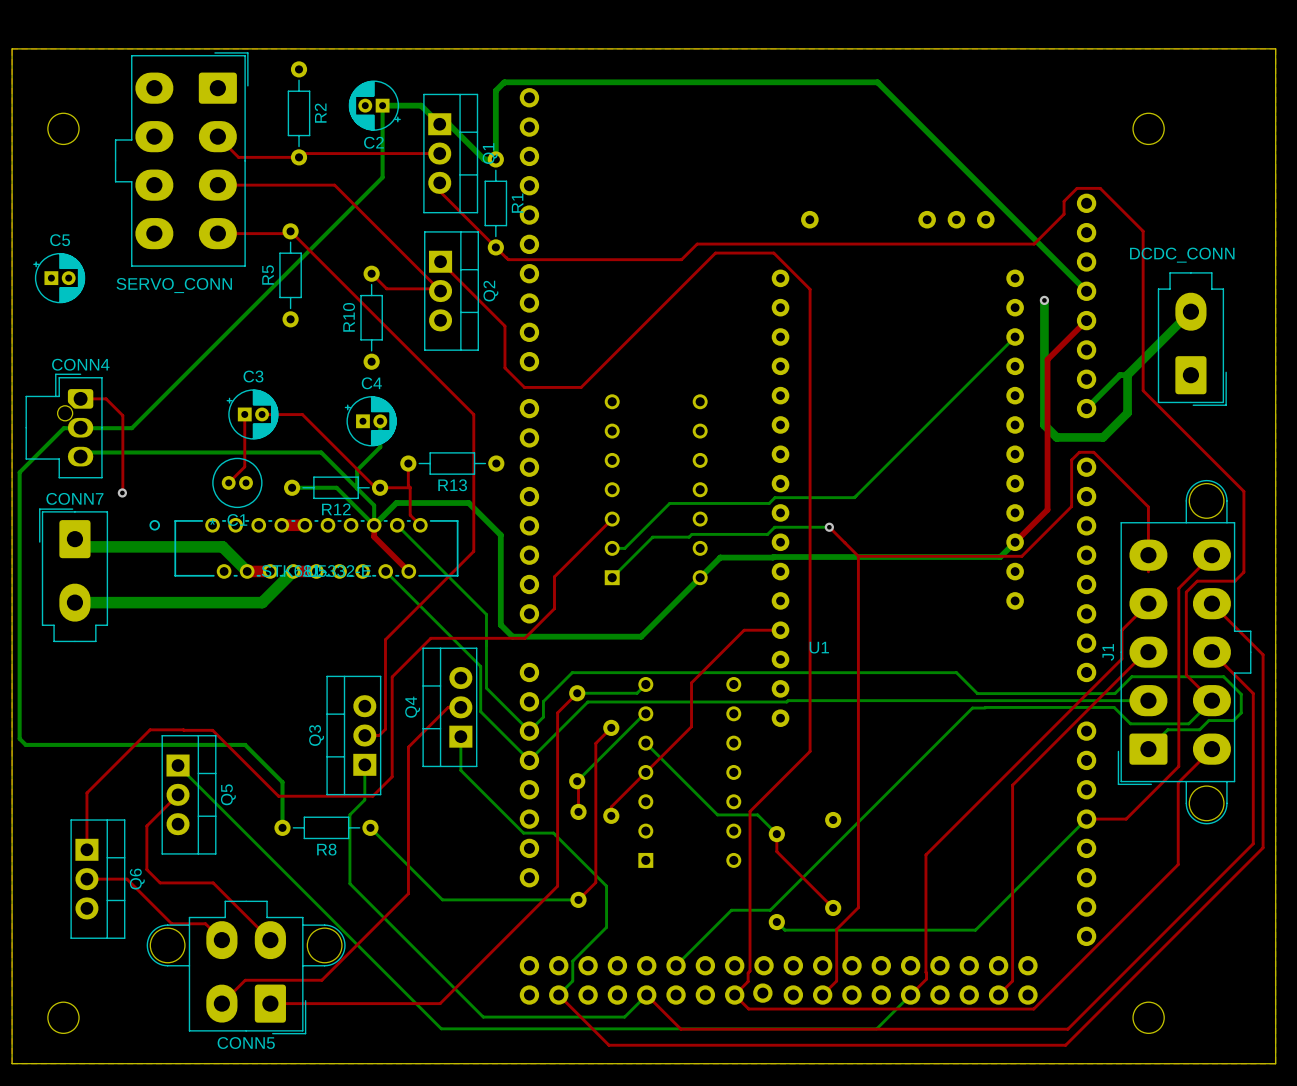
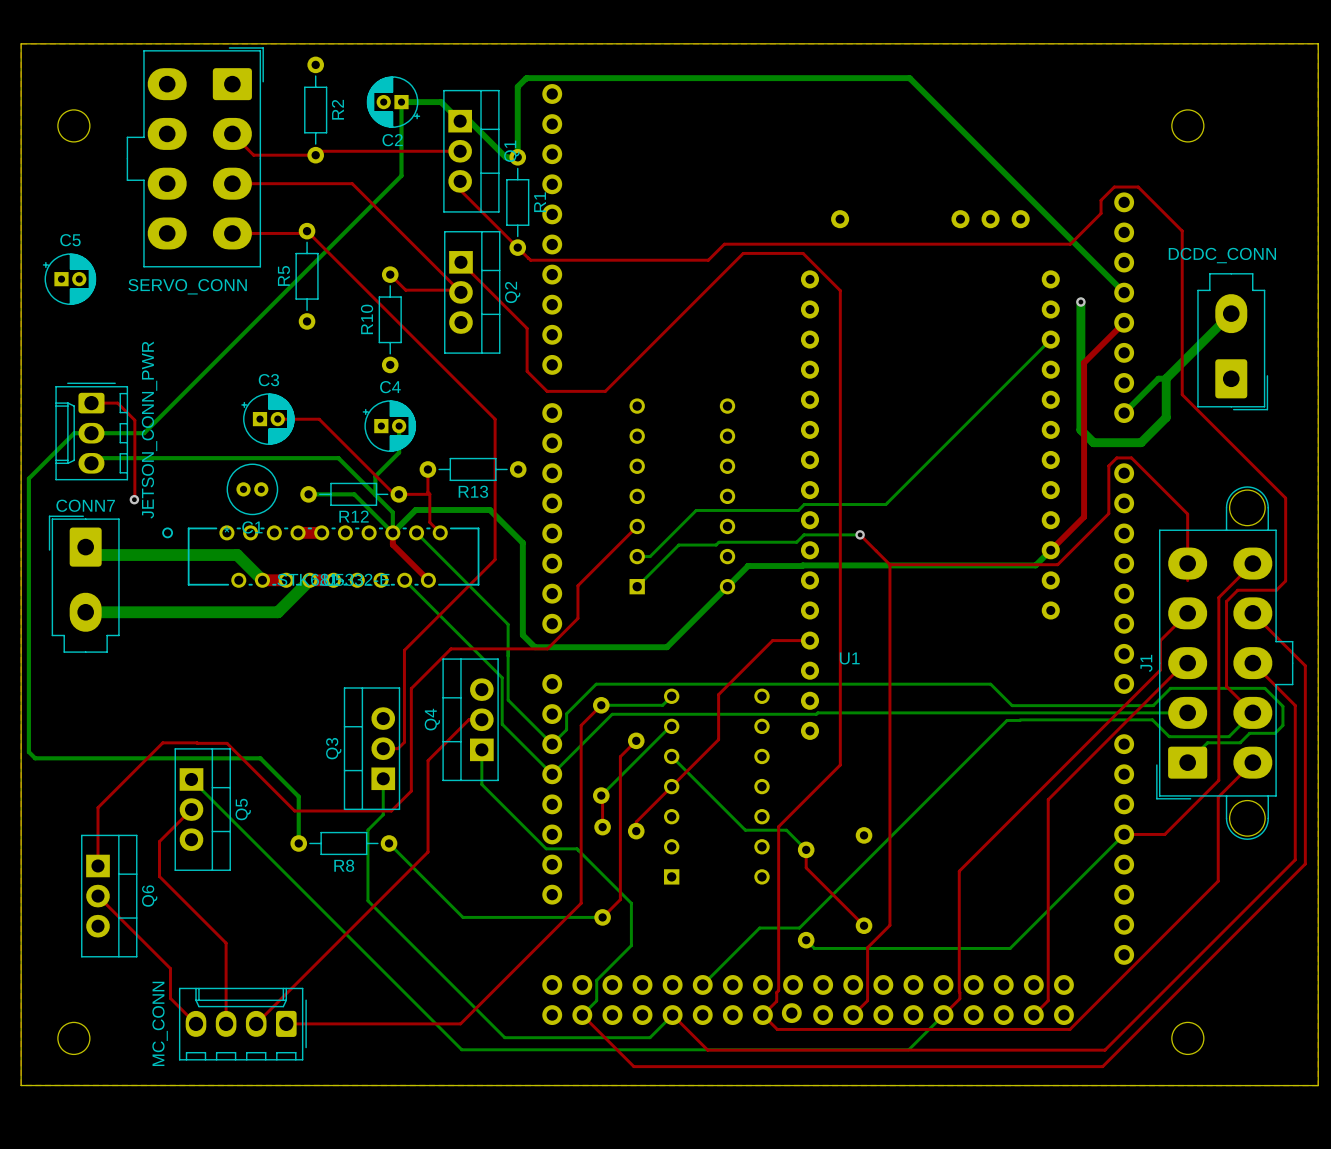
top track: (244, 414) (244, 466) (228, 482) -> none
CONN4: (64, 426) -> none
part: none -> JETSON_CONN_PWR (91, 431)
top track: (408, 836) (408, 893) (321, 980) (245, 980) (221, 1003) -> (428, 852) (256, 1023)
top track: (146, 860) (146, 869) (160, 882) (213, 882) (270, 940) -> (159, 876) (226, 943) (226, 1023)
top track: (86, 879) (127, 879) (171, 923) (205, 923) (221, 940) -> (98, 896) (170, 968) (170, 998) (196, 1023)
CONN5: (246, 967) -> none
part: none -> MC_CONN (242, 1024)

